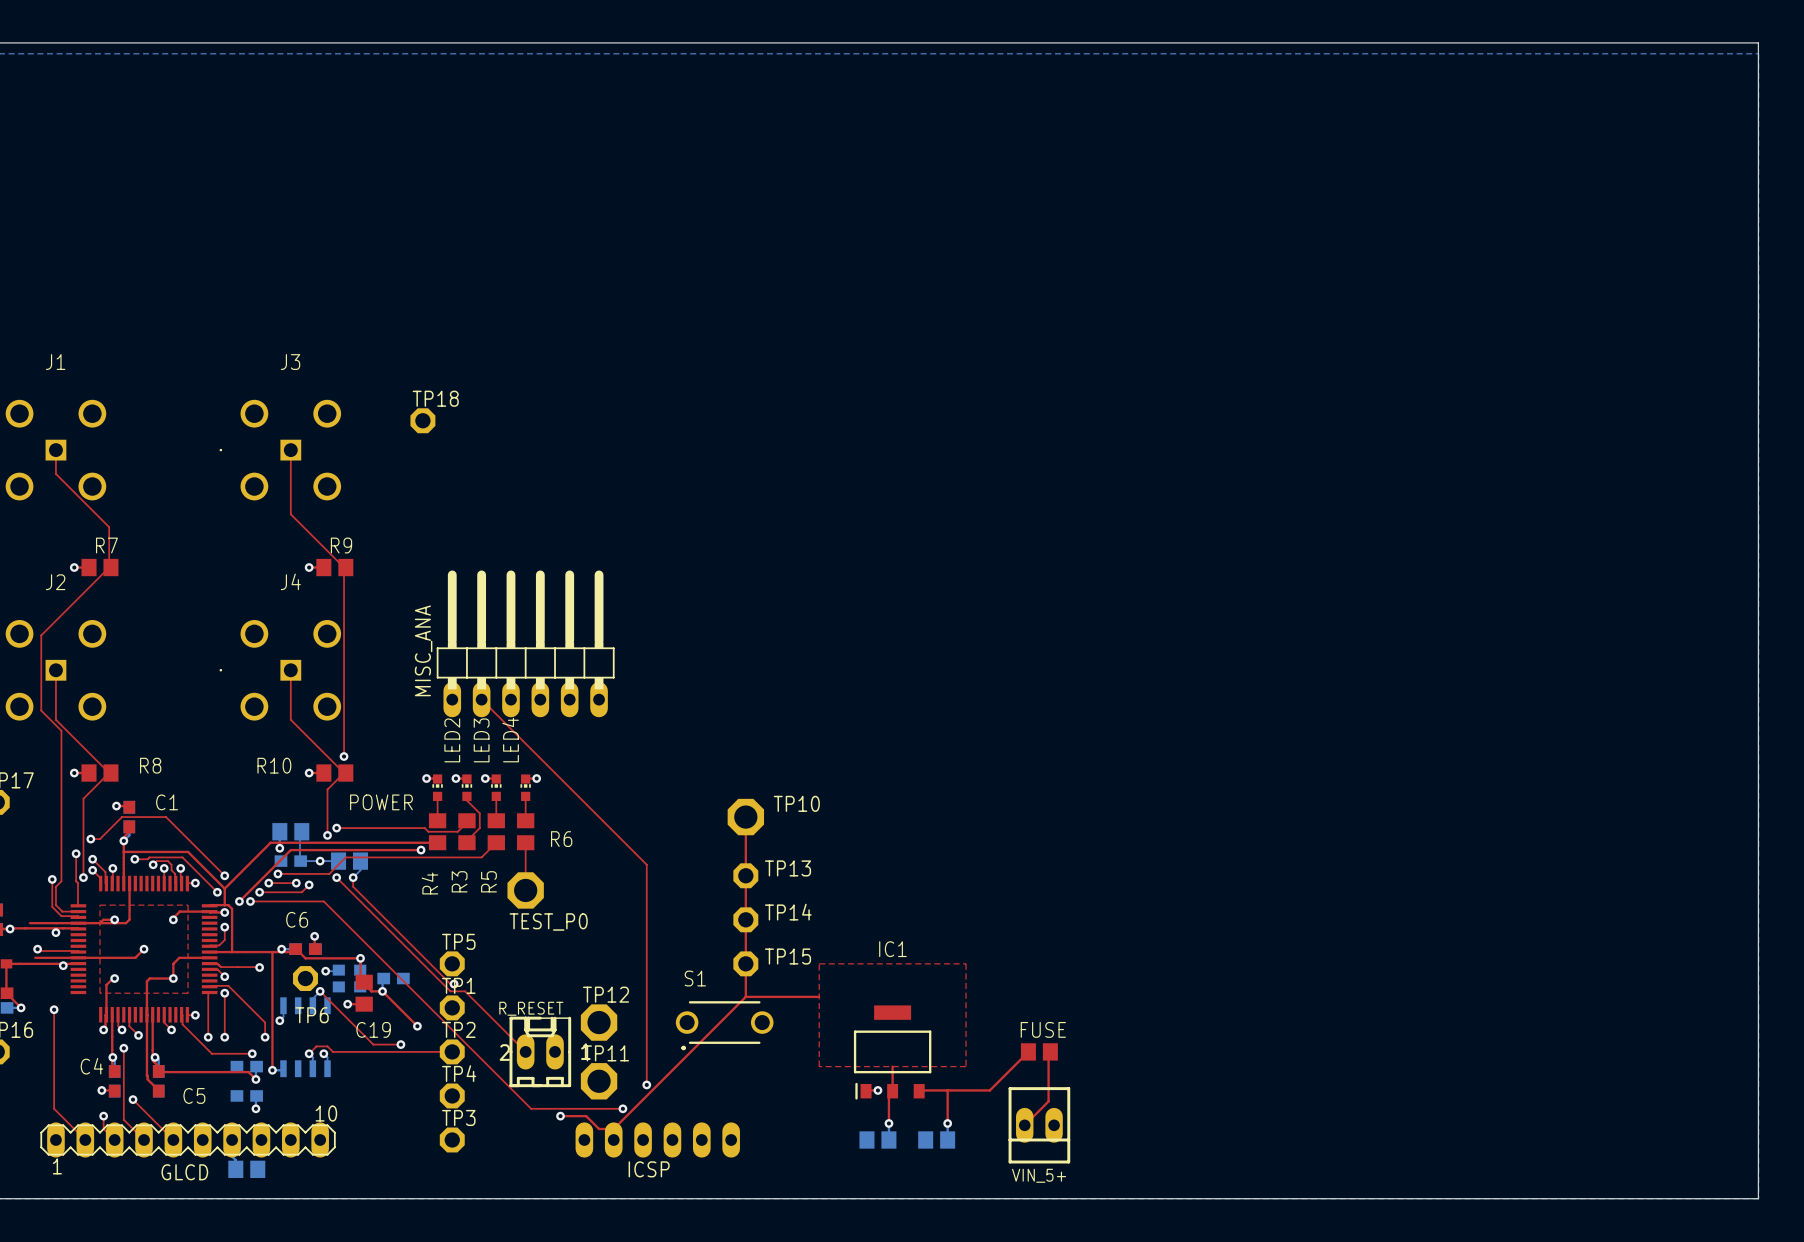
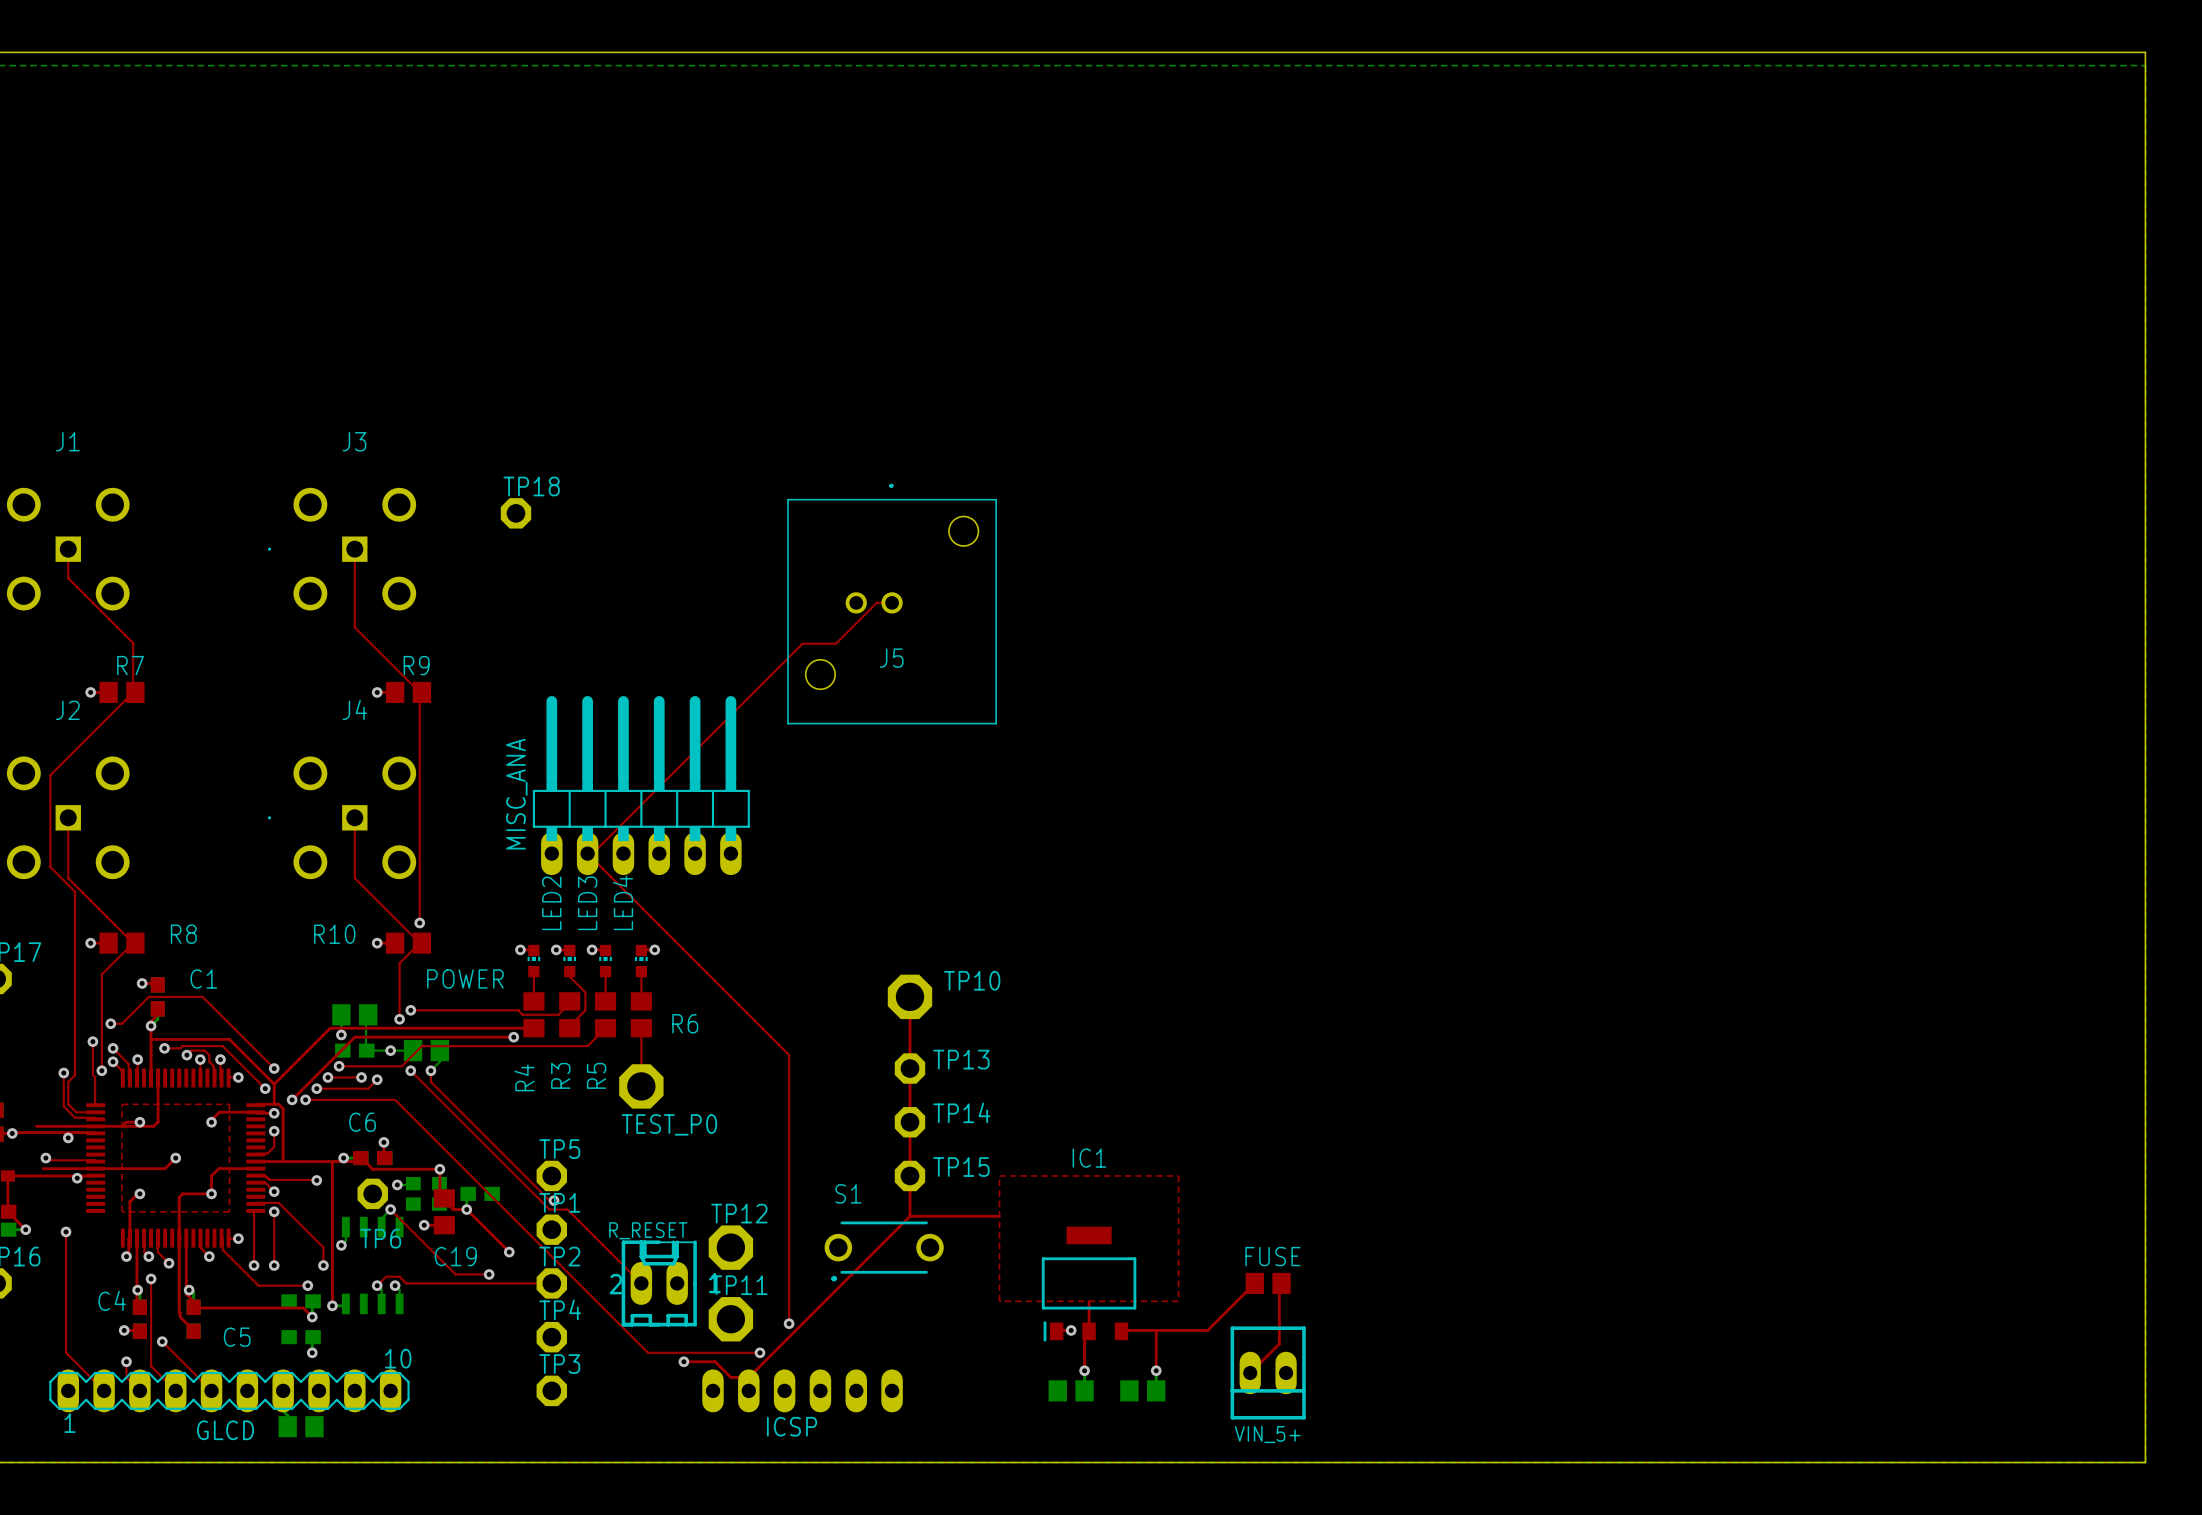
top track: none -> (892, 602) (876, 602) (835, 643) (802, 643) (590, 855) (587, 853)
J5: none -> (892, 604)

